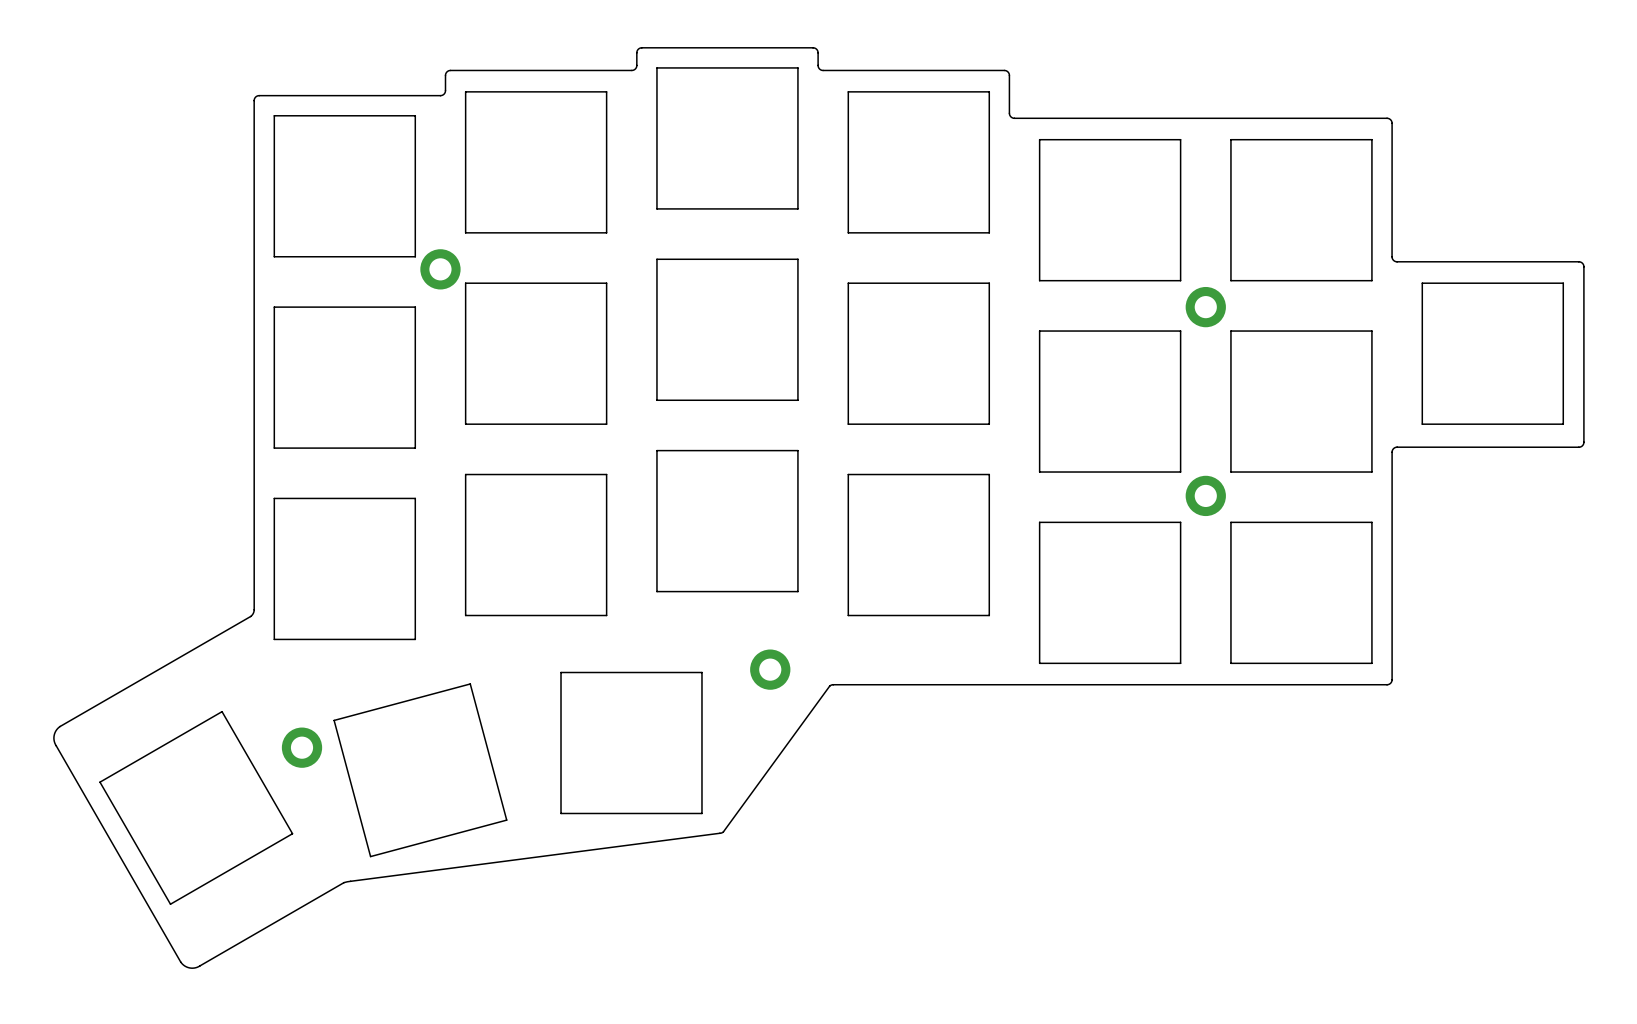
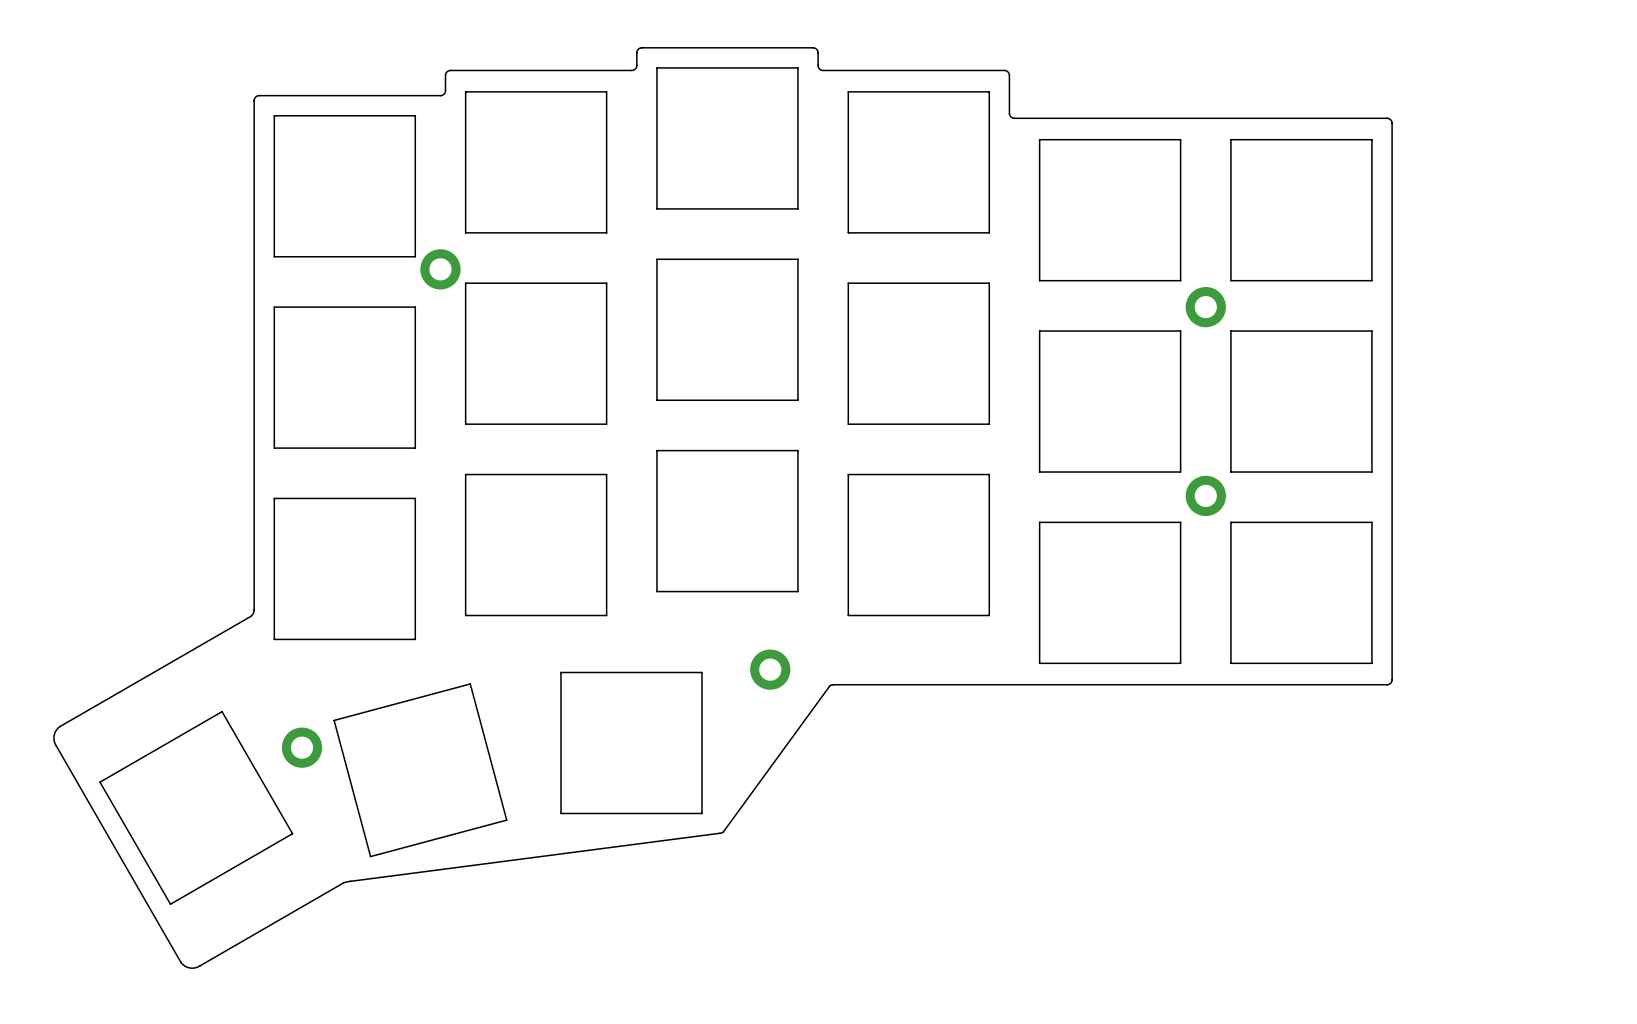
board edge: (1392, 123) (1392, 256) (1394, 260) (1578, 261) (1583, 266) (1582, 445) (1397, 447) (1392, 452) -> (1392, 123) (1392, 452)
board edge: (1563, 283) (1563, 424) (1422, 424) (1422, 283) (1563, 283) -> none

